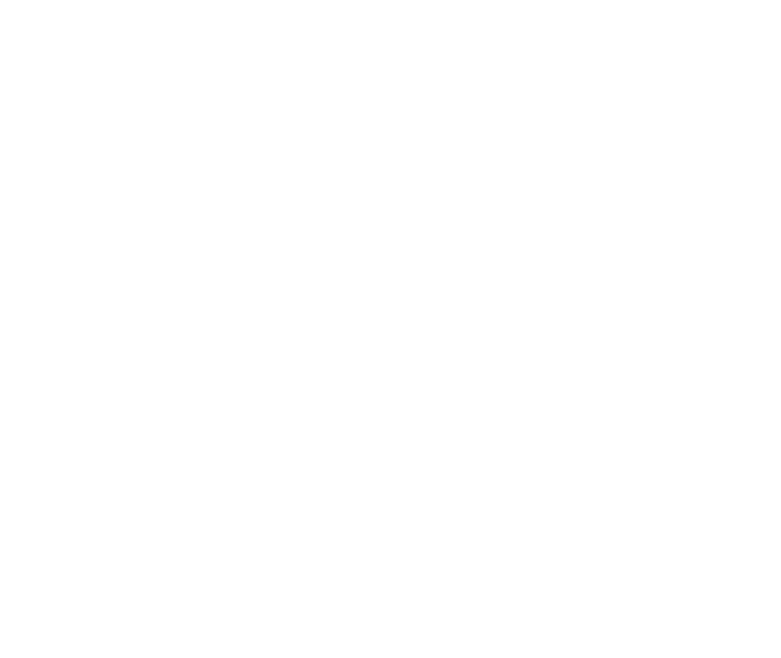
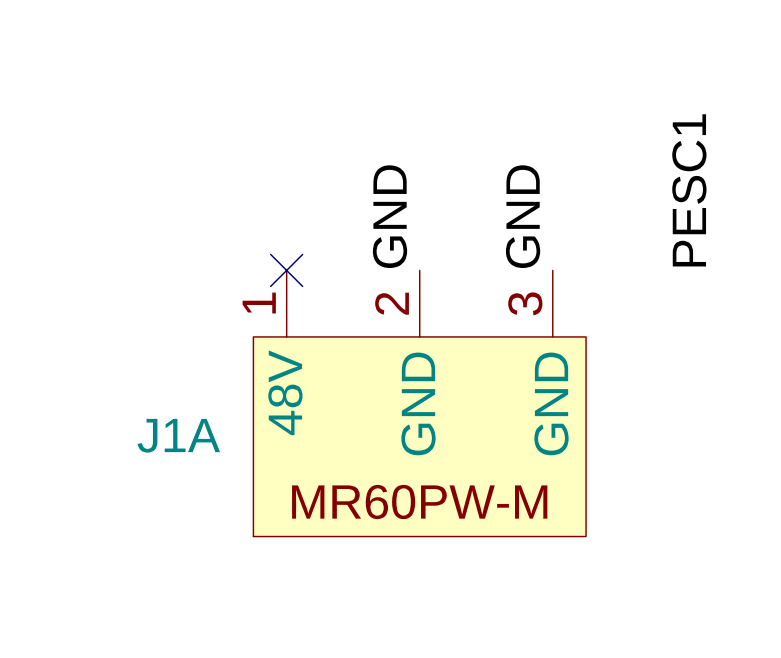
label: none -> PESC1 (689, 190)
label: none -> GND (390, 216)
label: none -> GND (523, 216)
no-connect mark: none -> (286, 270)
J1A: none -> (419, 403)

